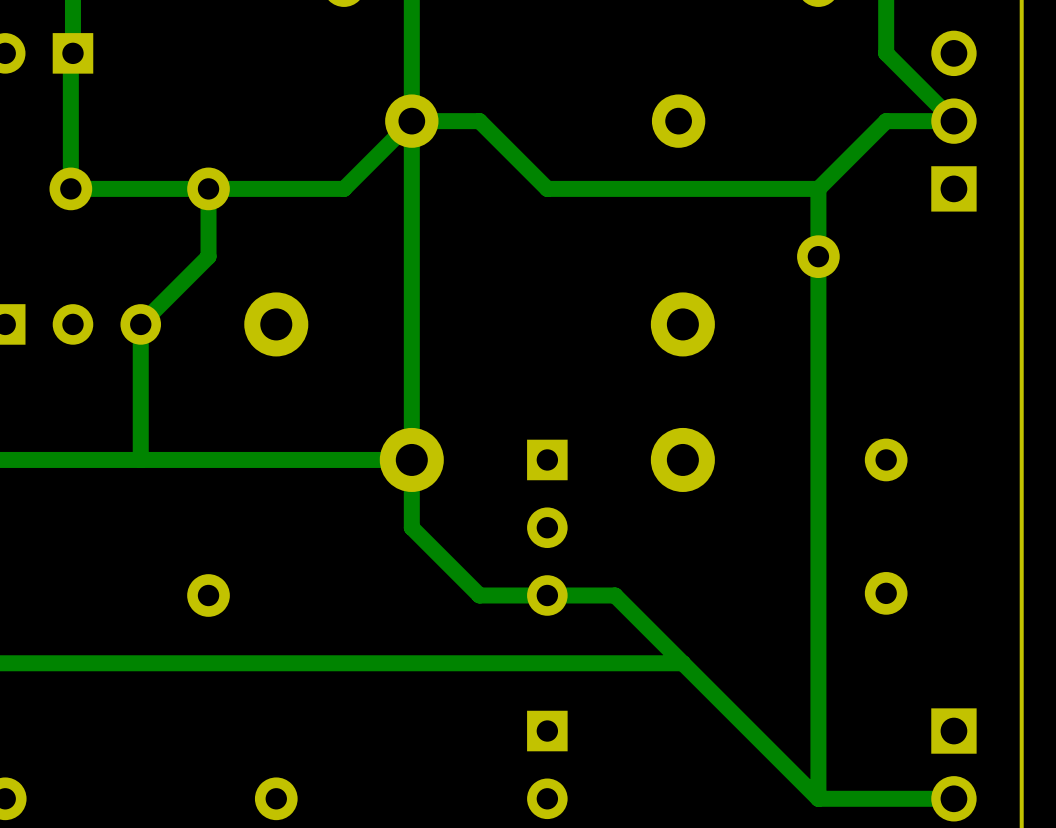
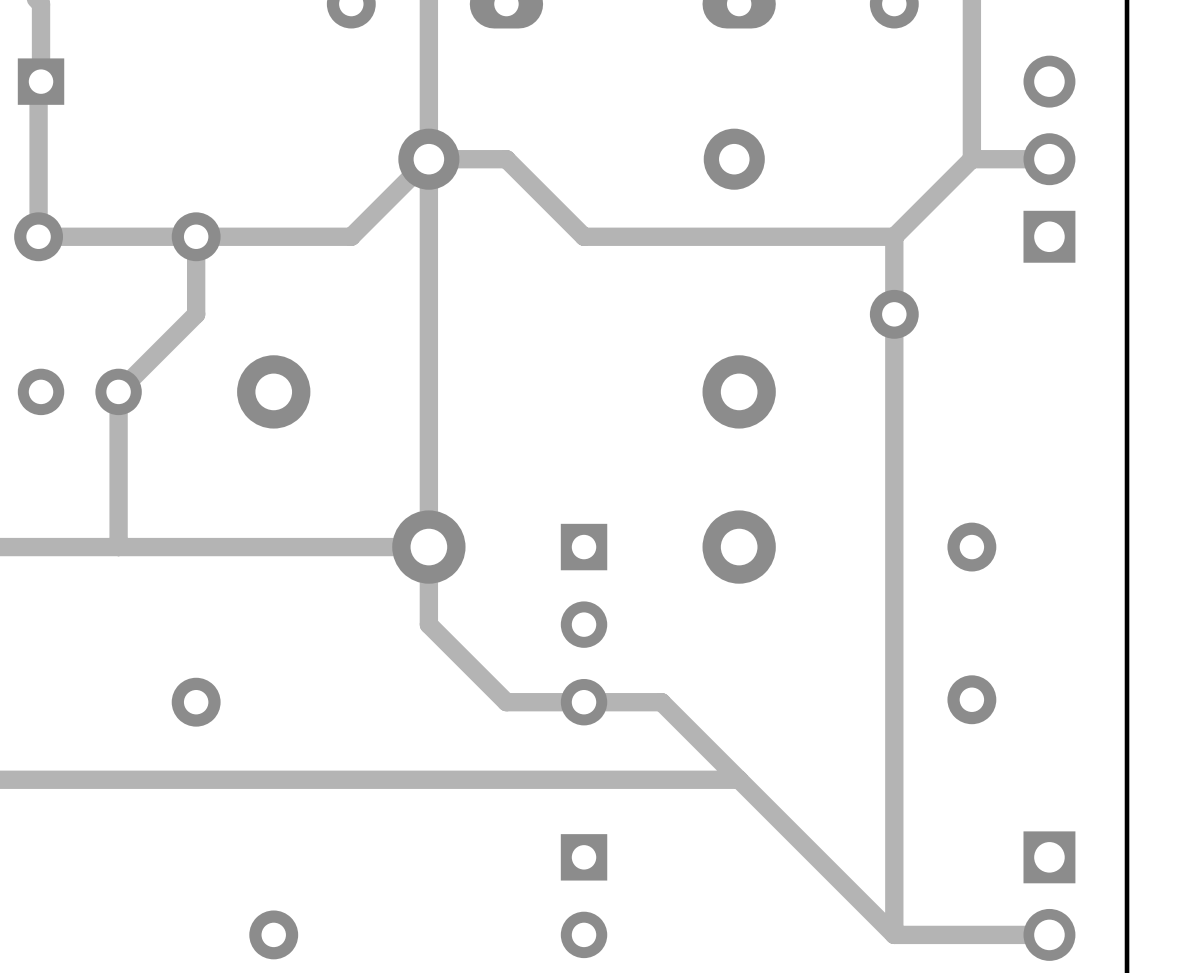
track: (886, 53) (953, 121) -> (971, 81) (971, 159)

